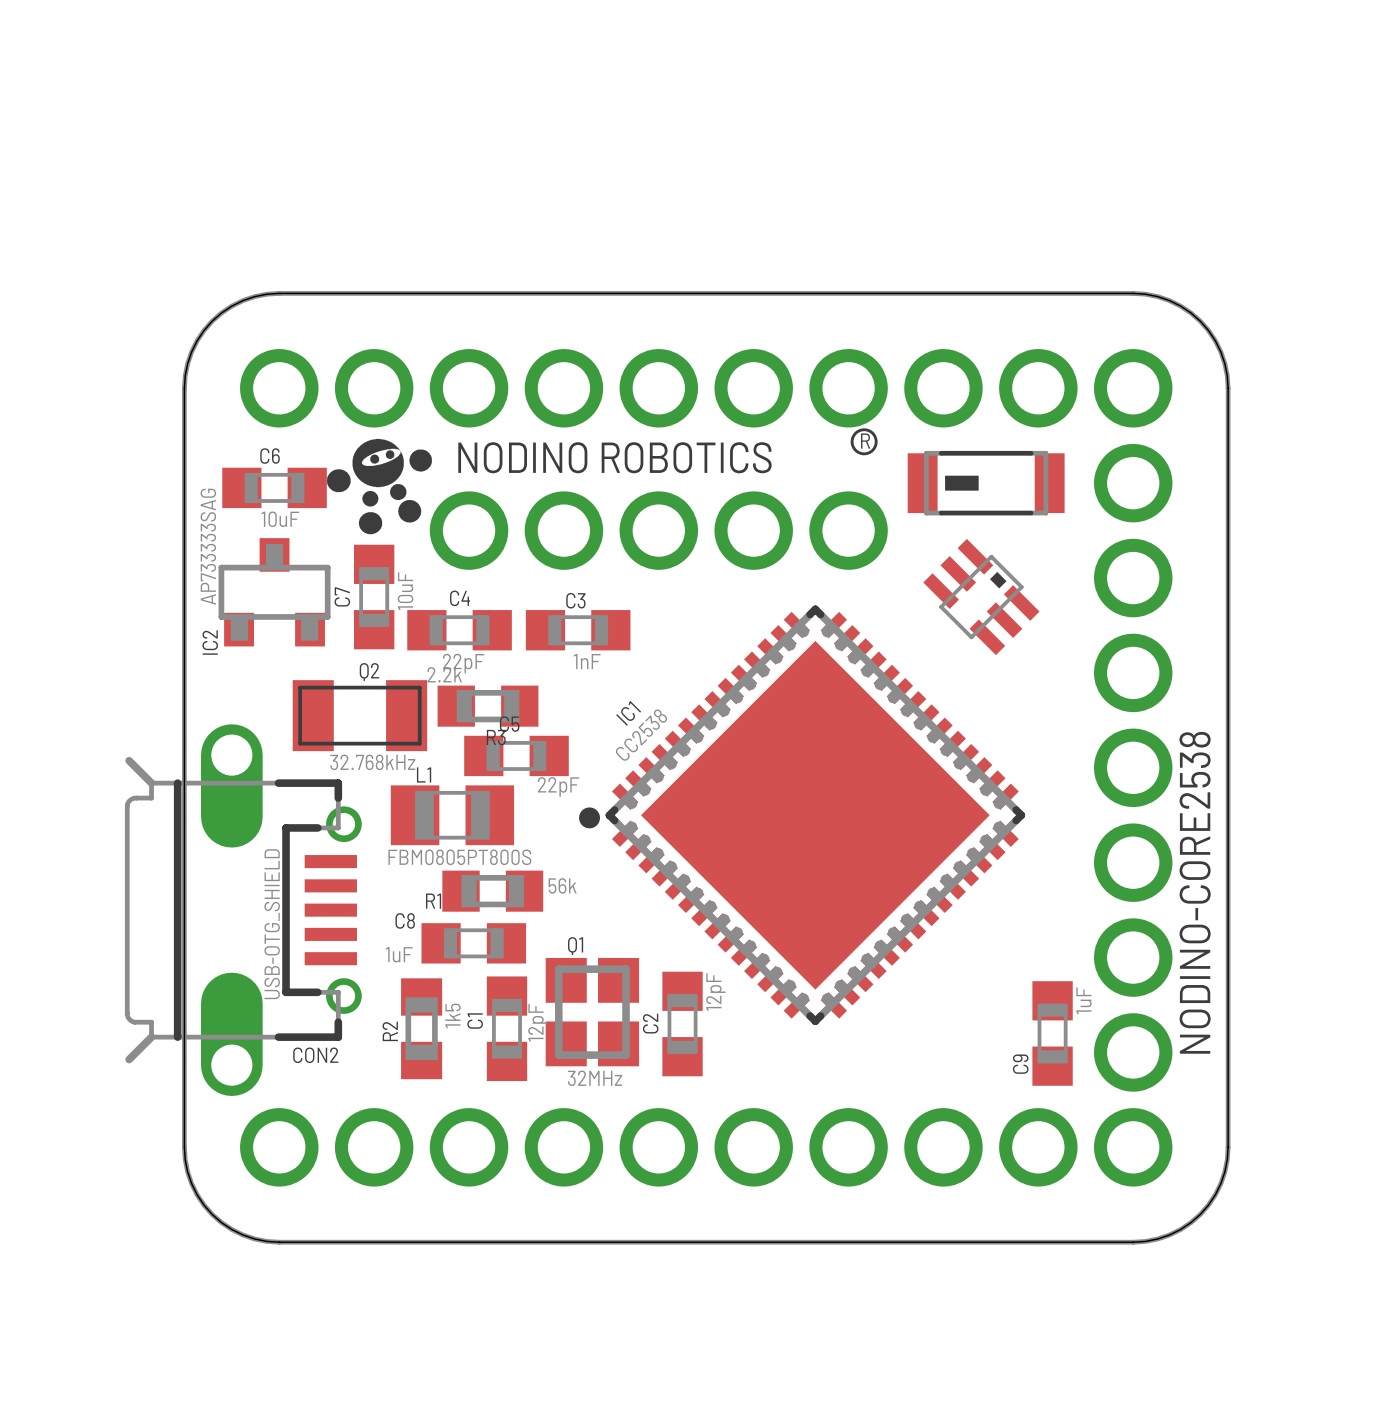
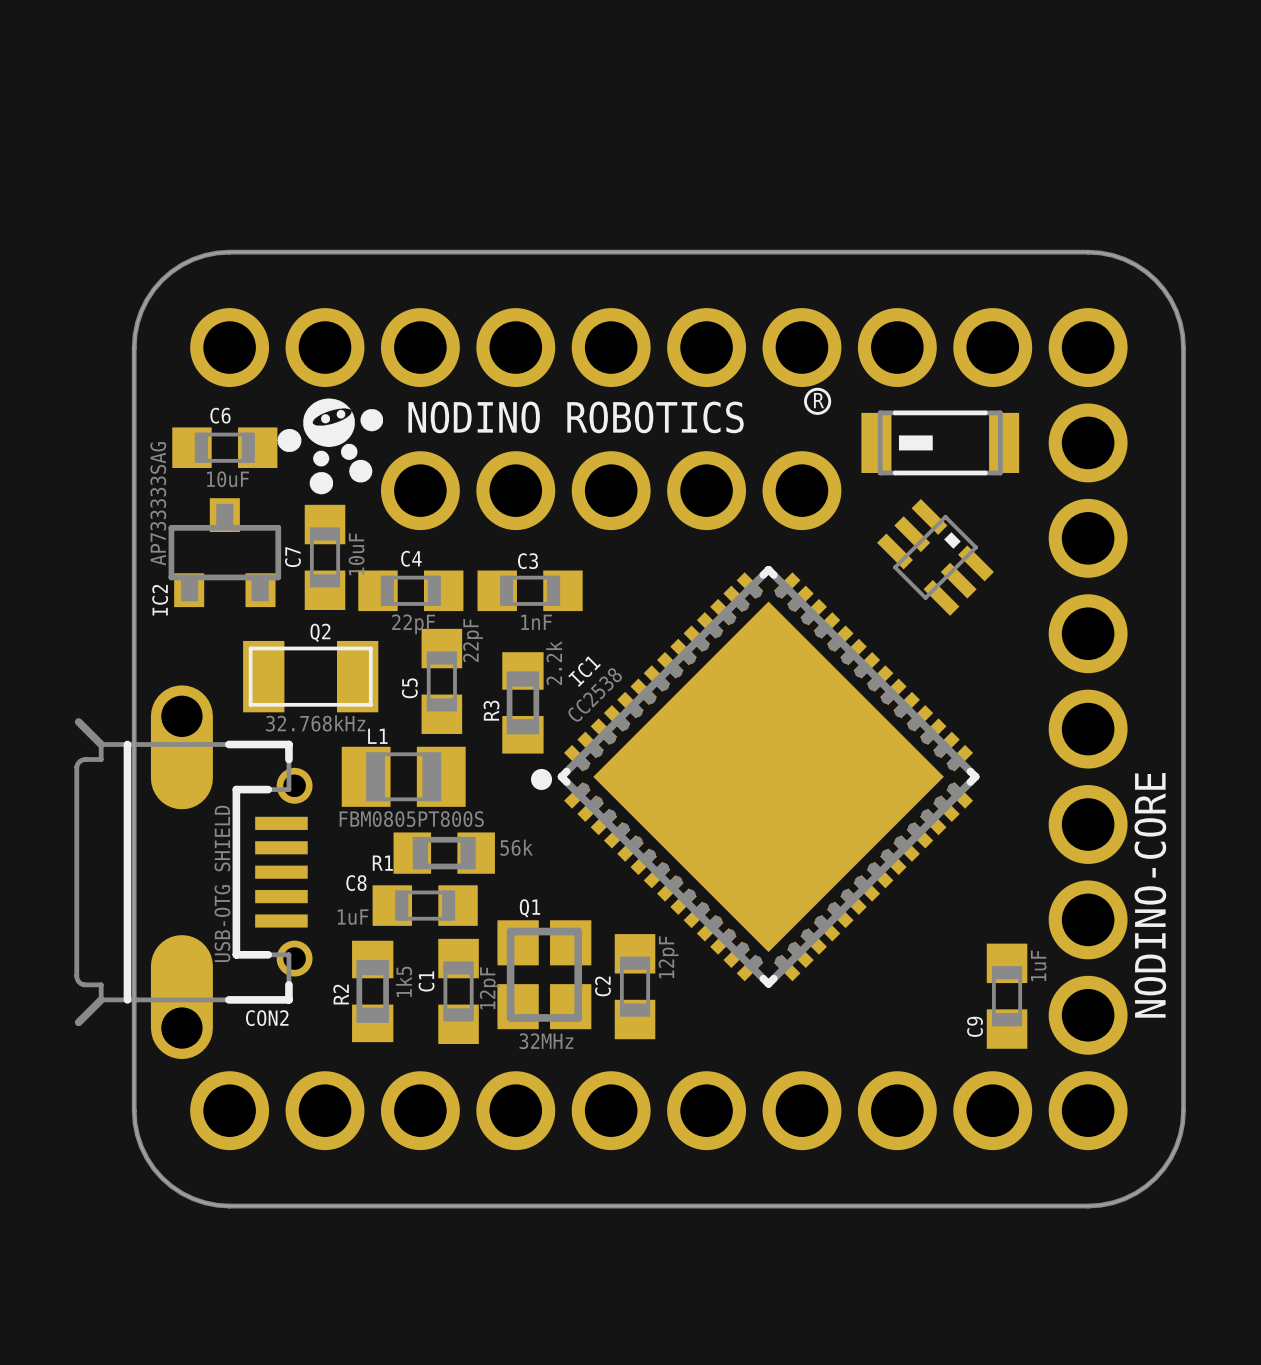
R3 rotation: 0° (488, 706) -> 90° clockwise (522, 702)
R3 position: (488, 706) -> (522, 702)
C5 rotation: 0° (516, 755) -> 90° clockwise (441, 681)
text: NODINO-CORE2538 (1195, 892) -> NODINO-CORE (1150, 895)

